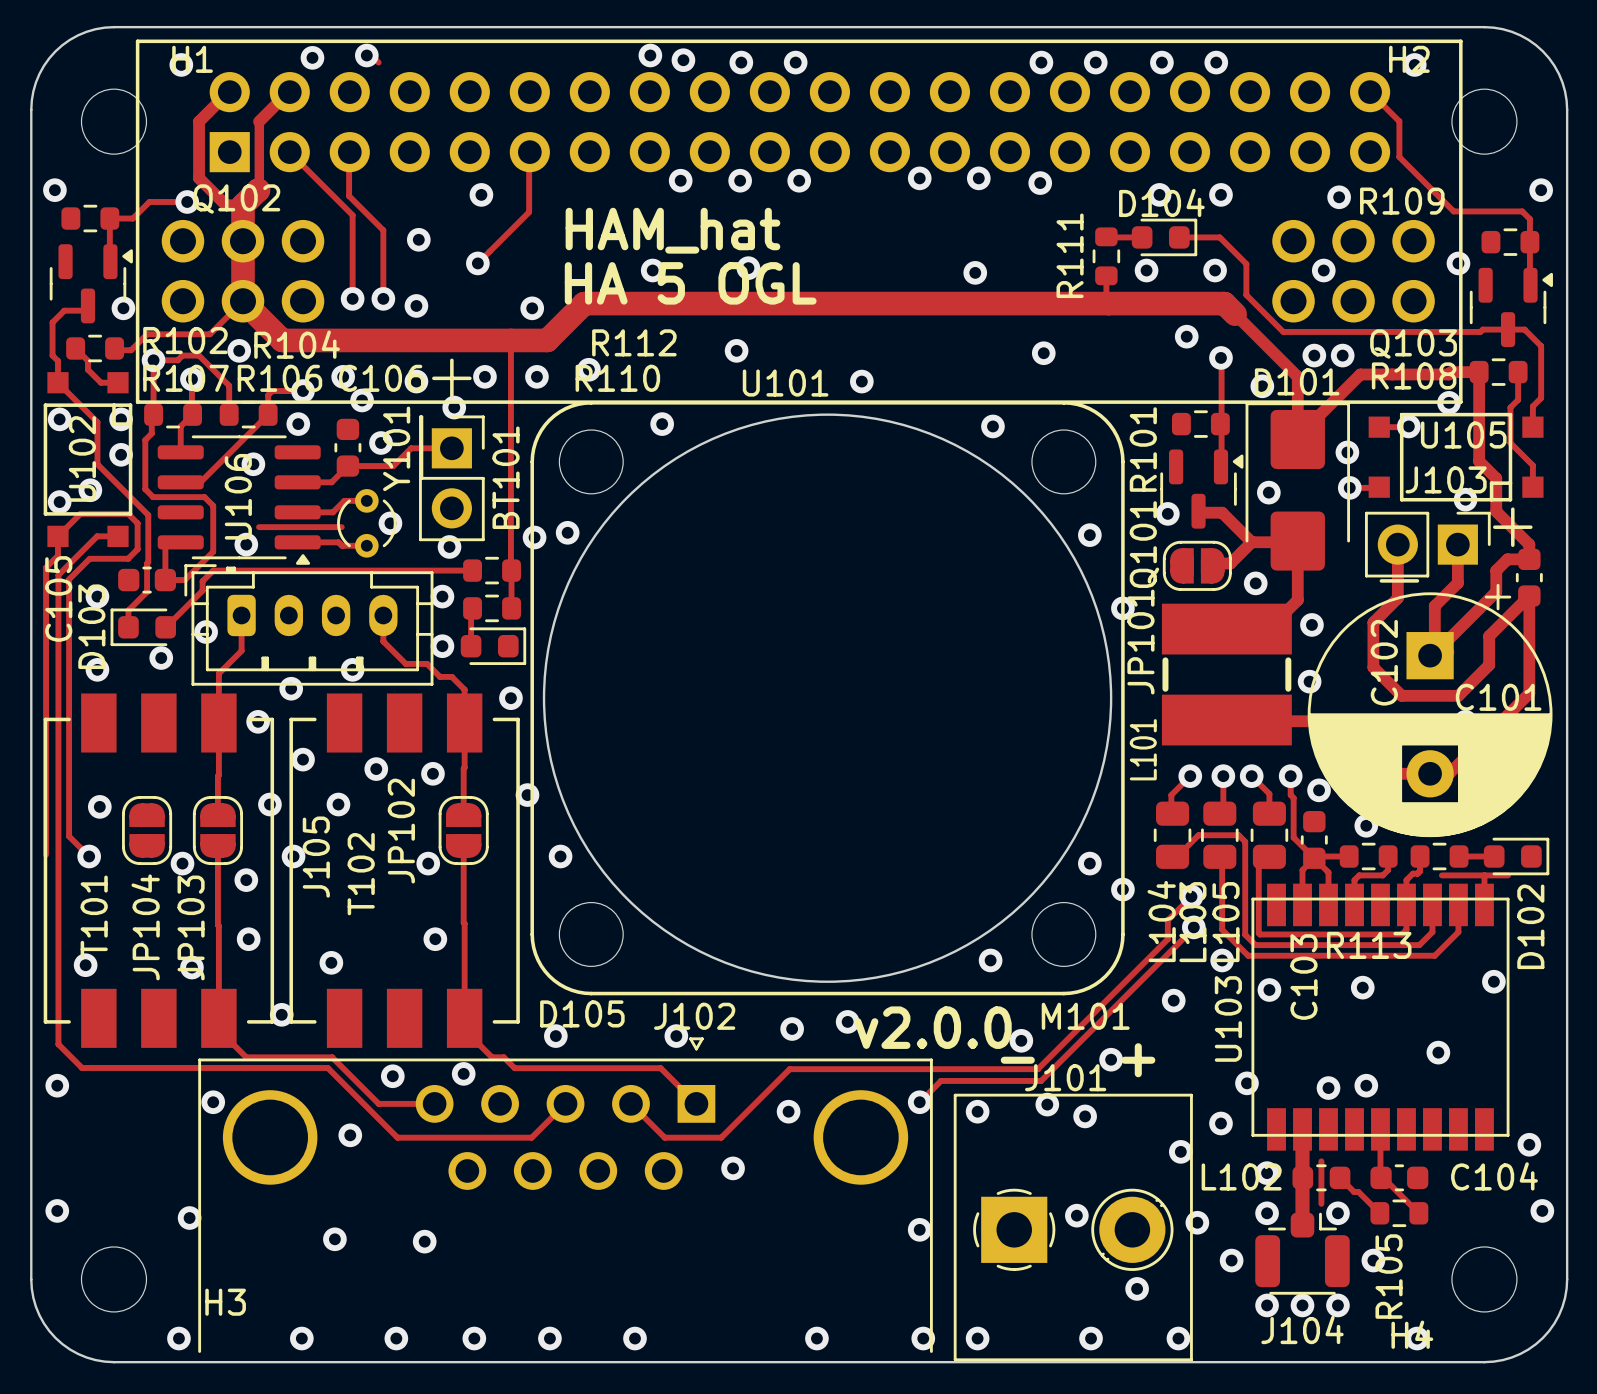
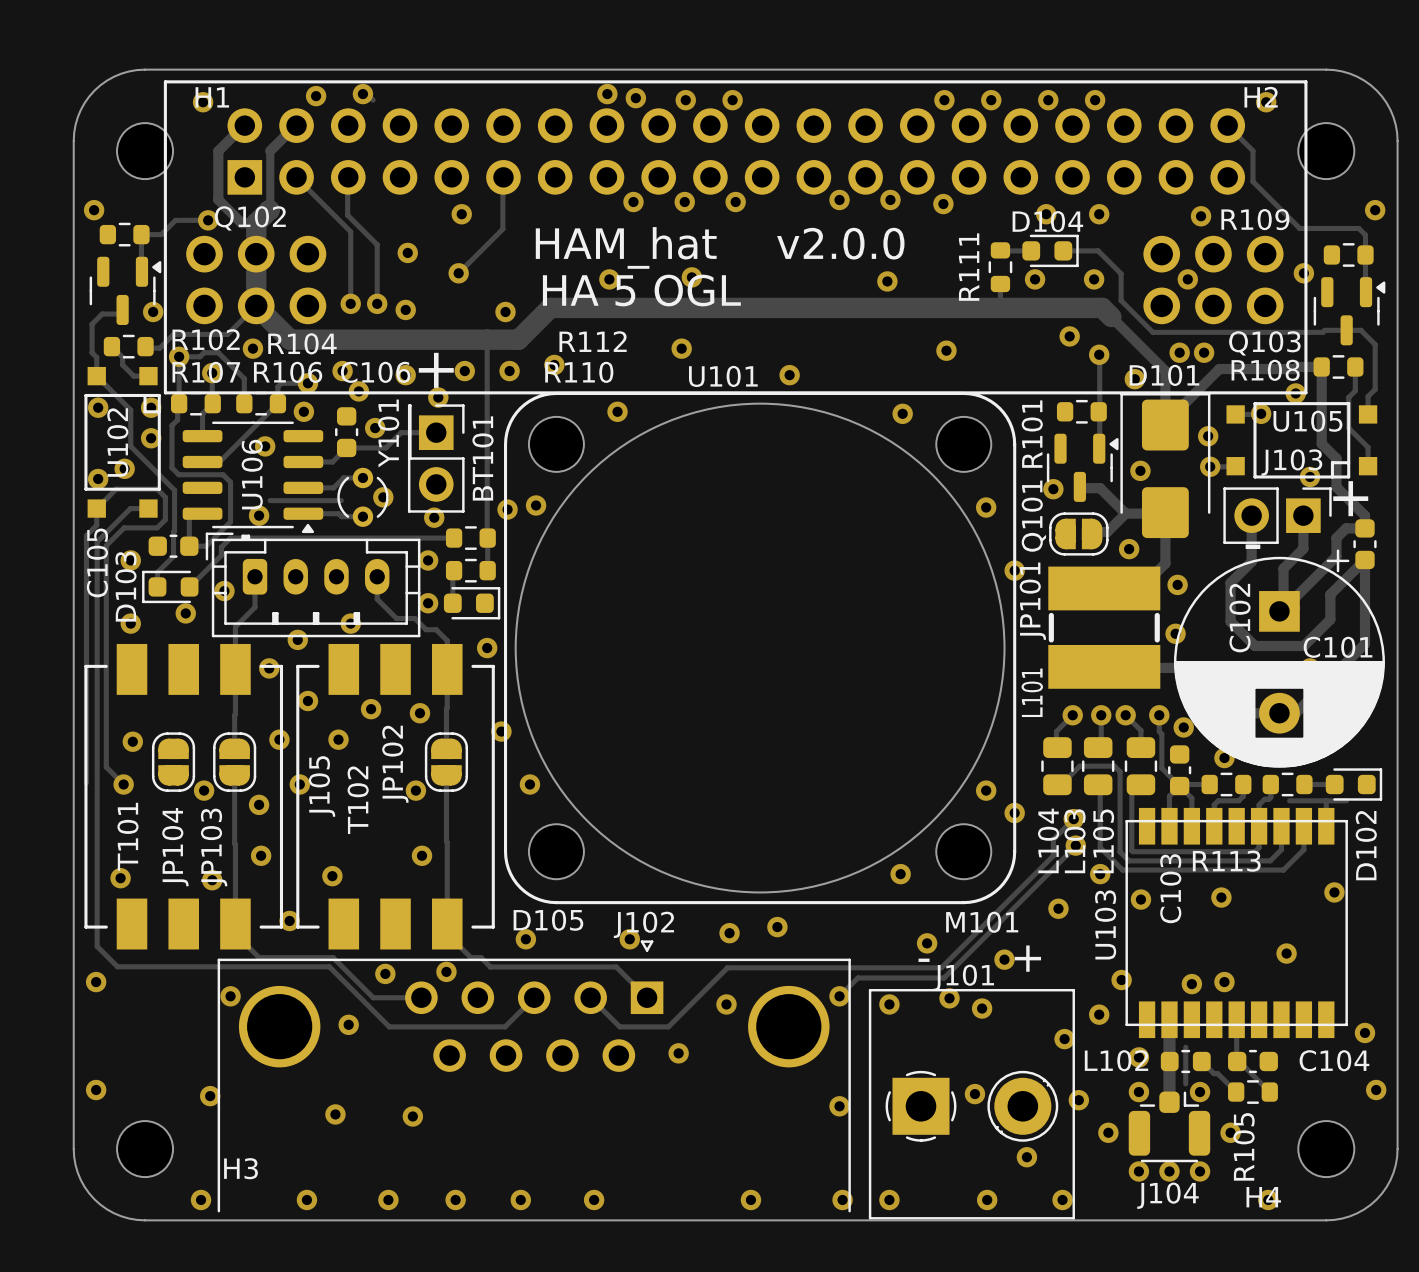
text: none -> v2.0.0 (840, 243)
text: v2.0.0 (933, 1027) -> none

